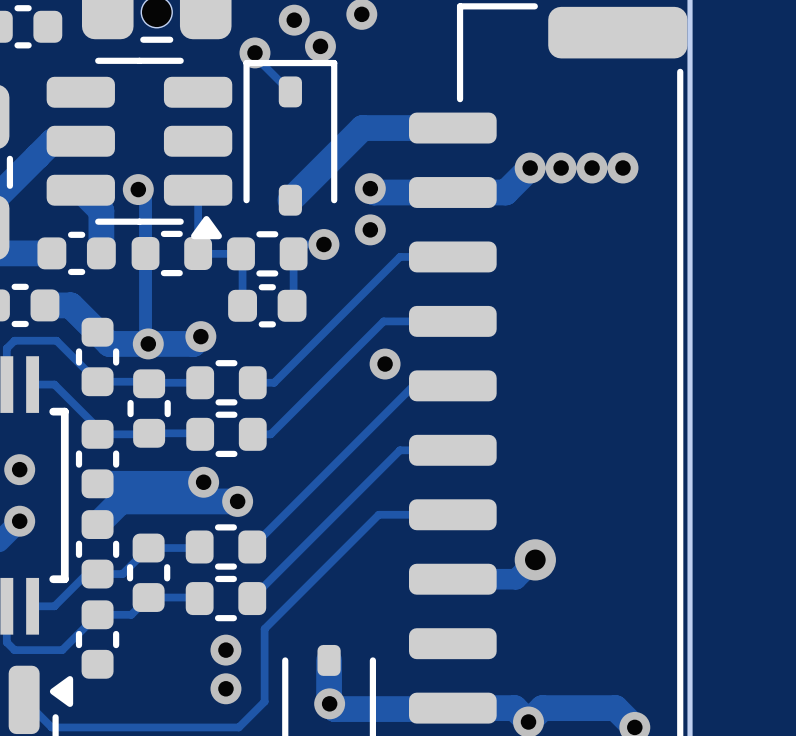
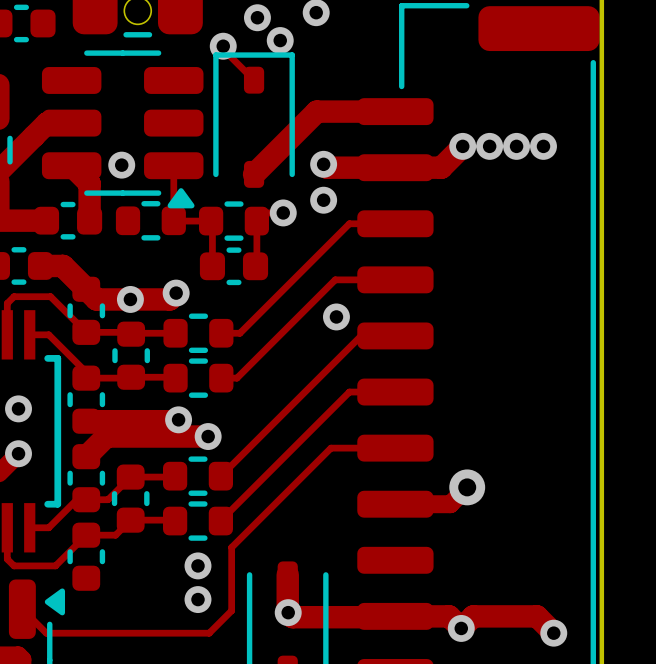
track: (138, 189) (145, 196) (145, 341) (148, 343) -> none

